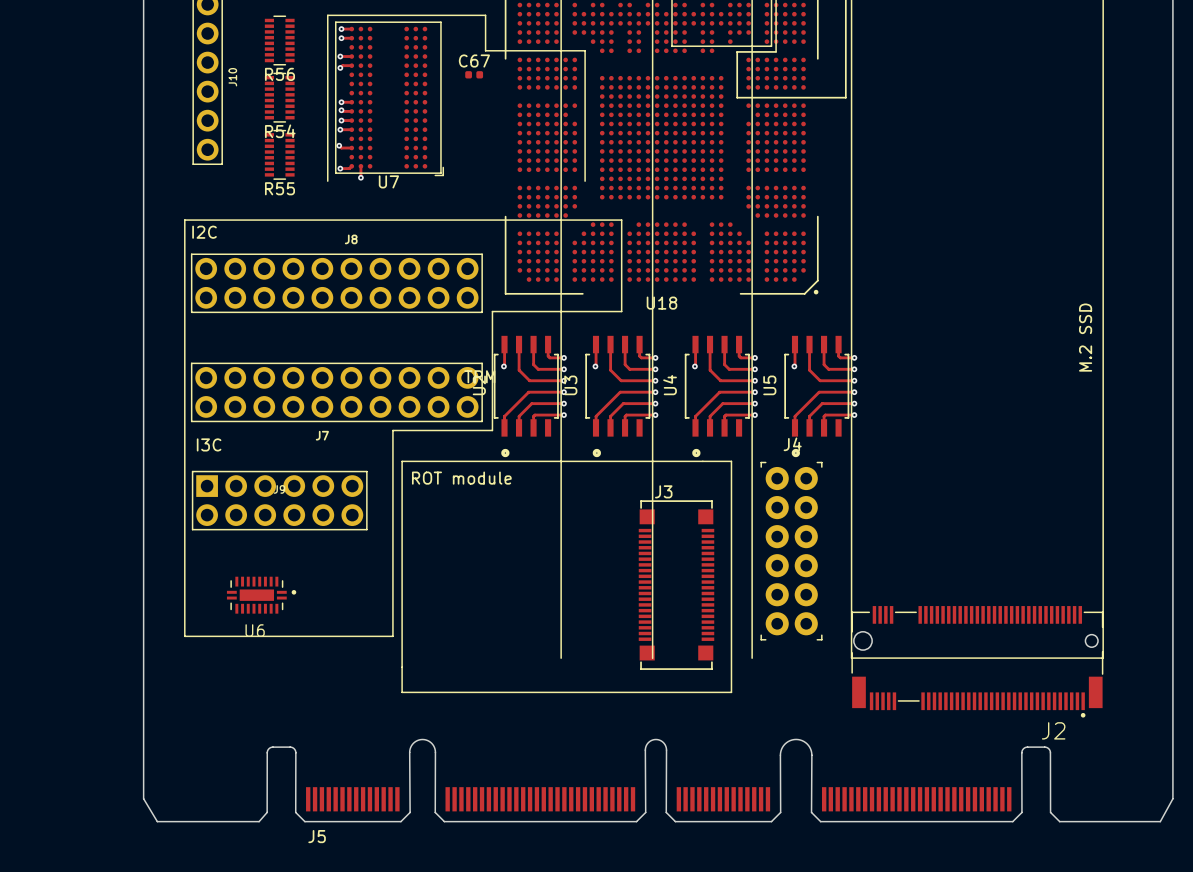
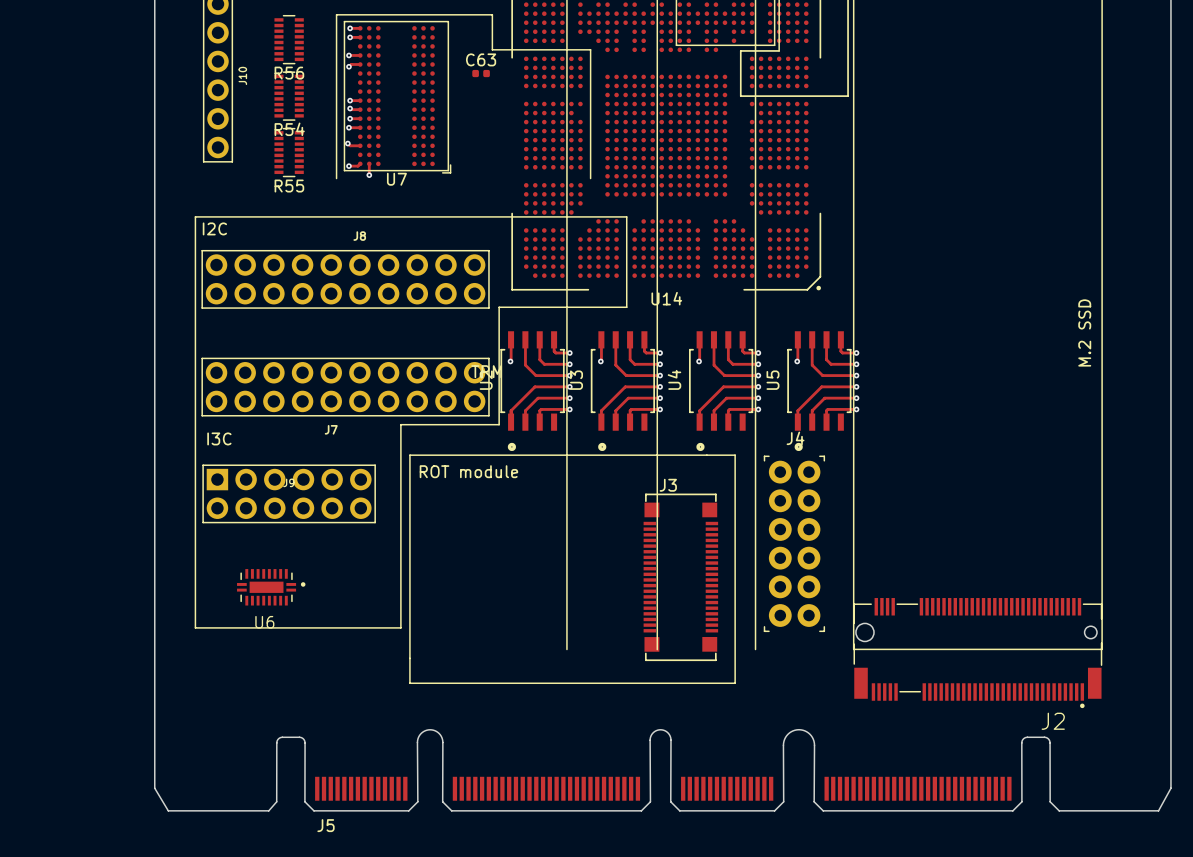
C67 name: C67 (474, 61) -> C63 (481, 59)
U18 name: U18 (661, 303) -> U14 (666, 298)

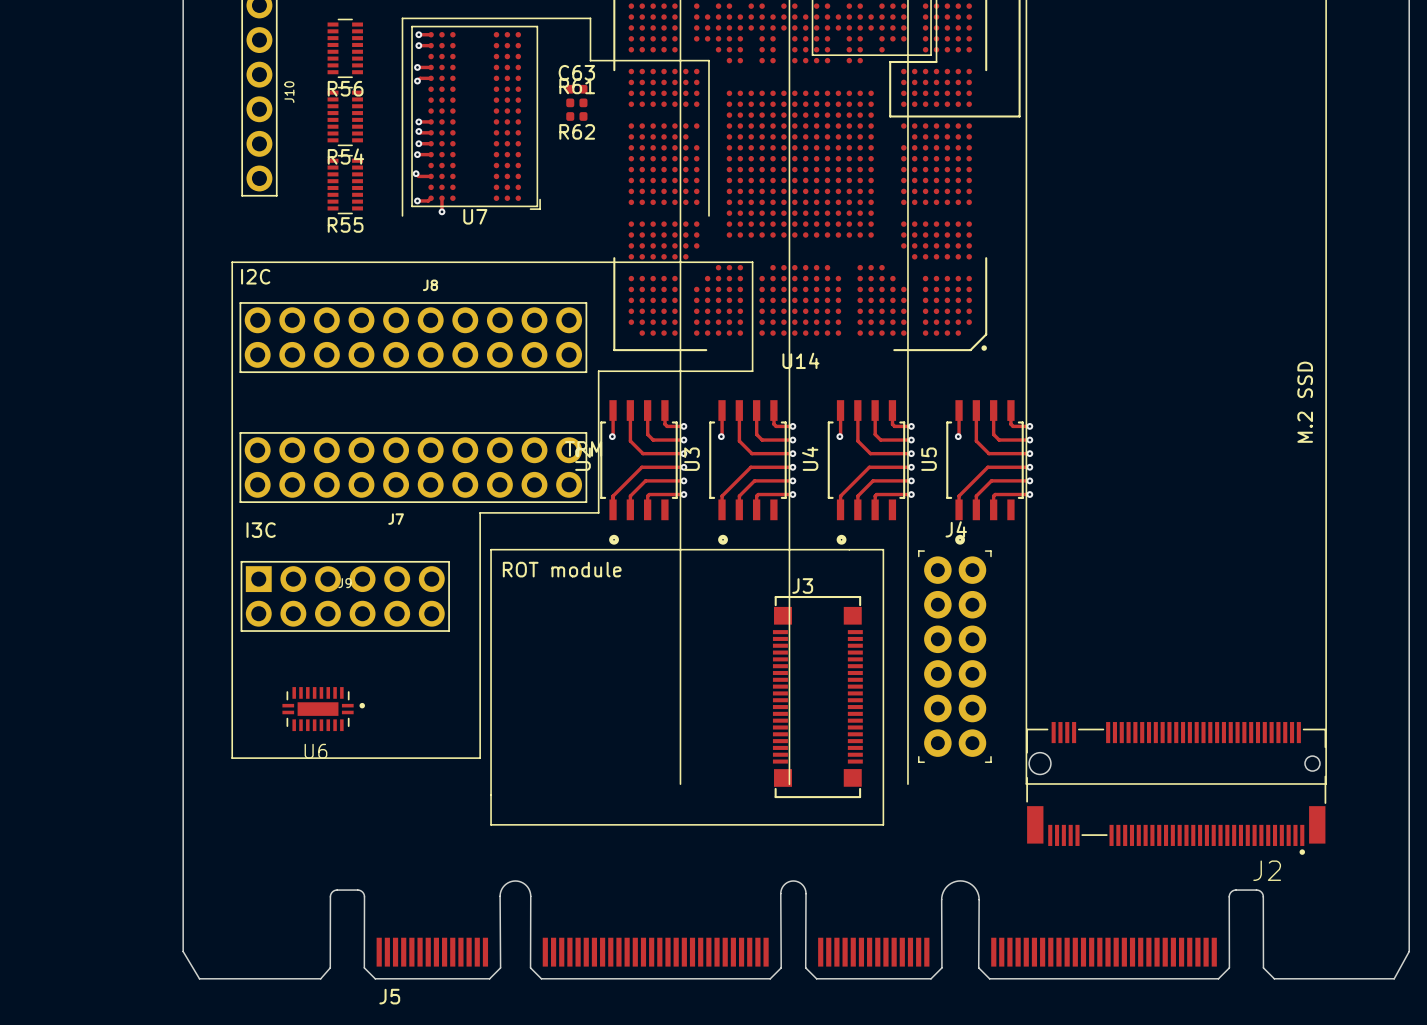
R61: none -> (576, 102)
R62: none -> (576, 116)

